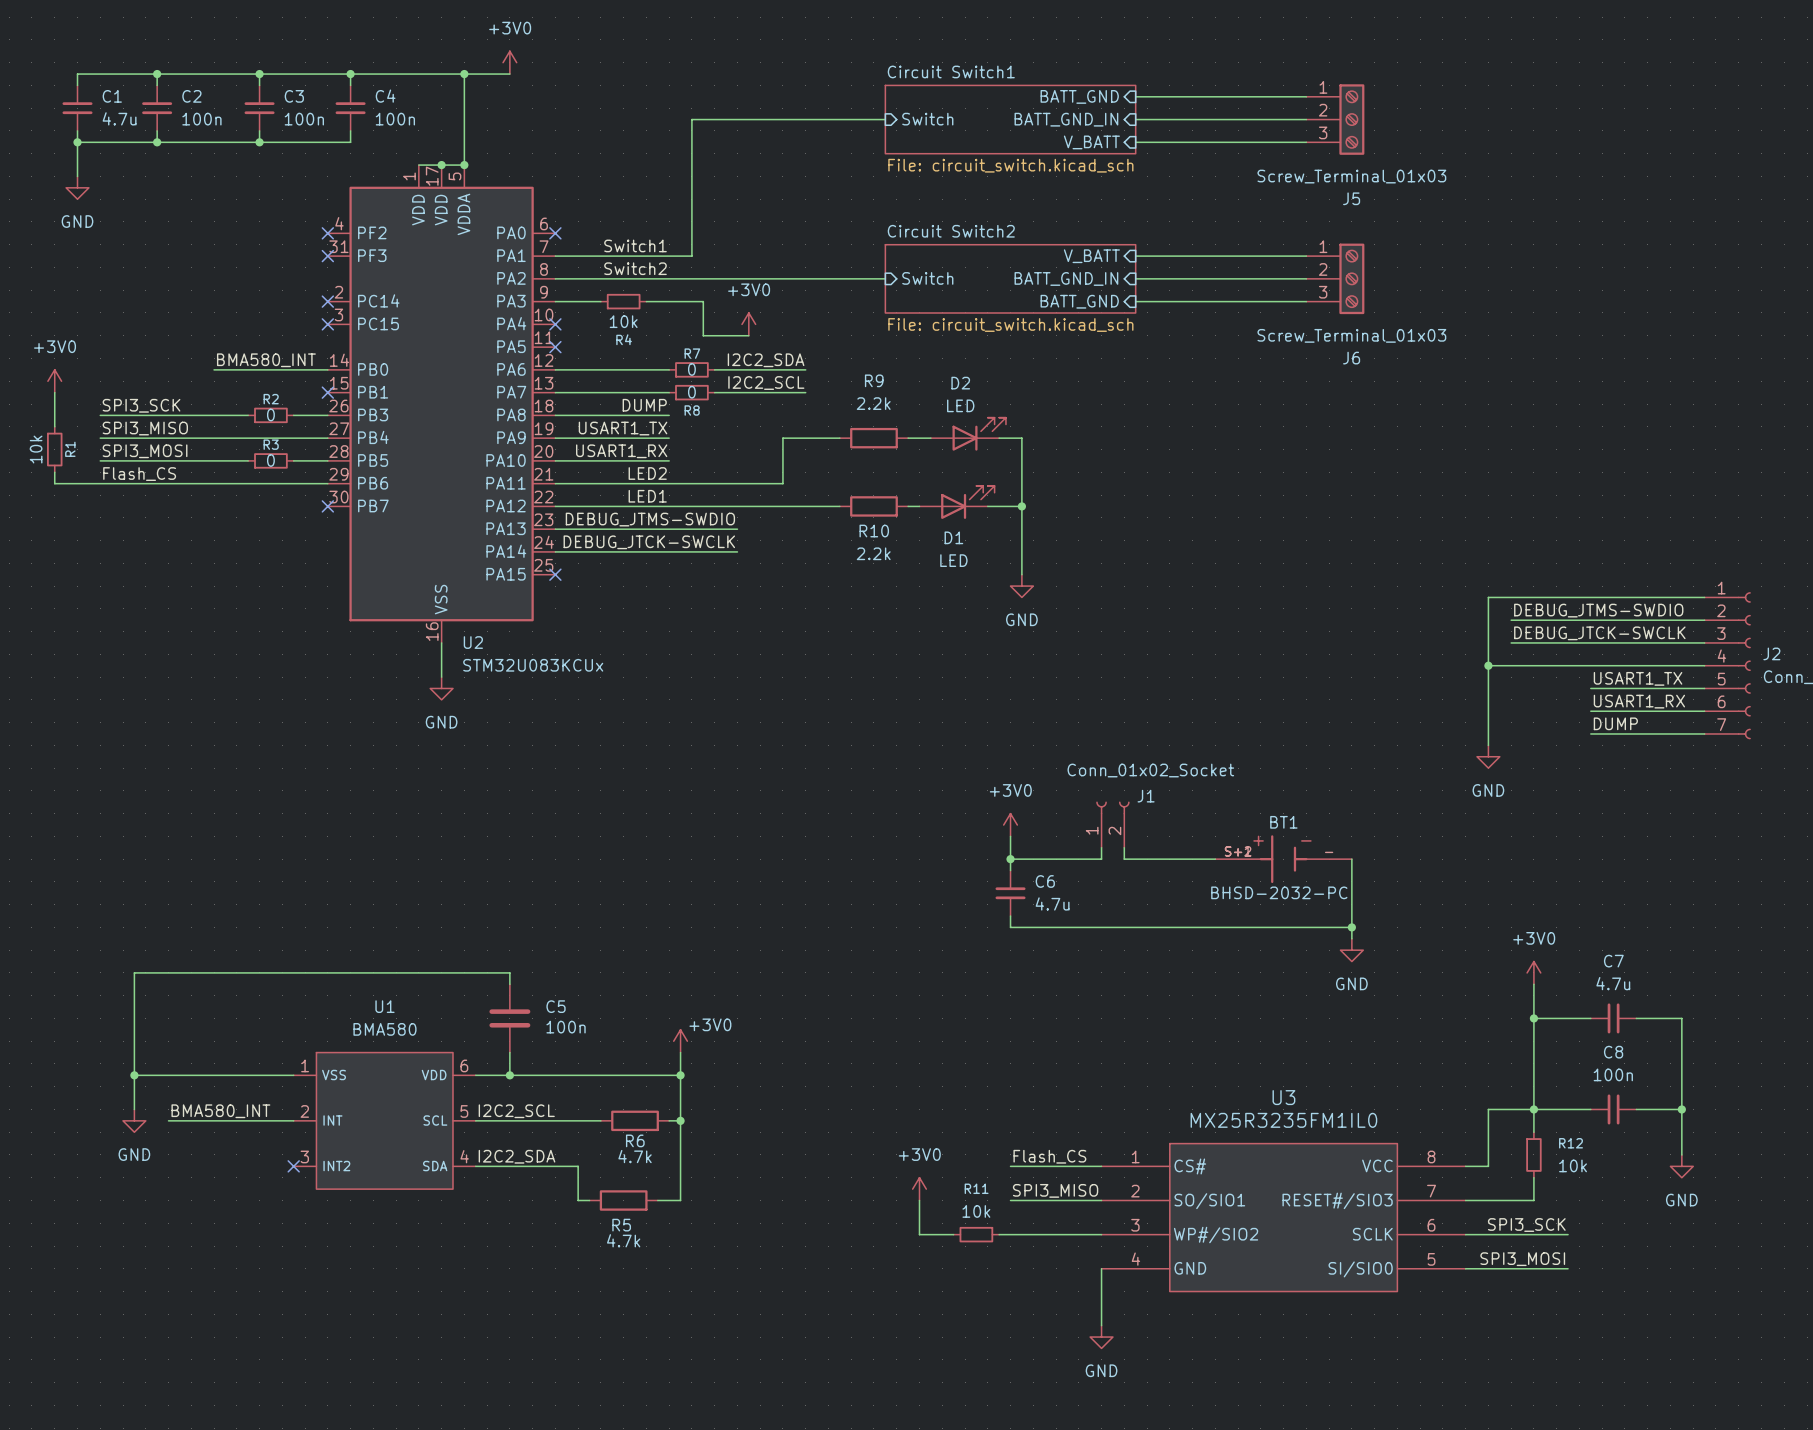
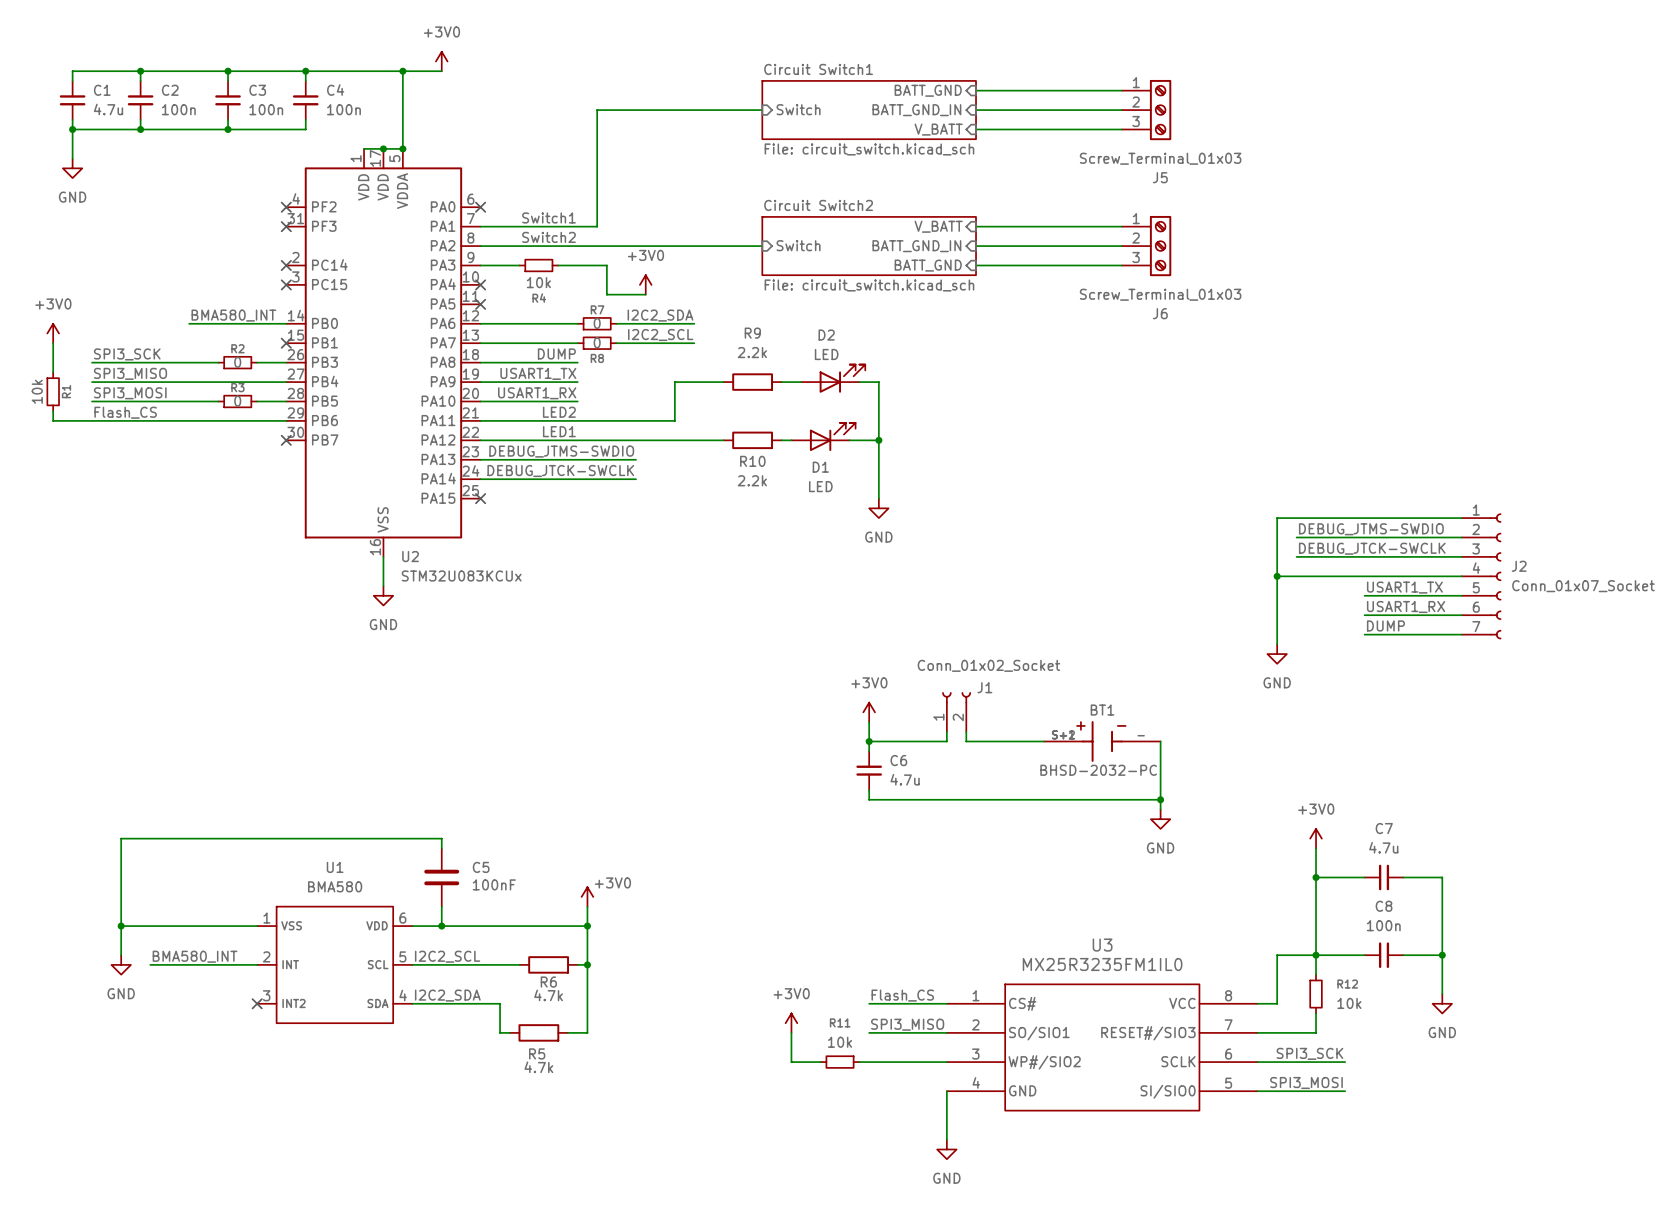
C5 value: 100n (566, 1027) -> 100nF (494, 884)

